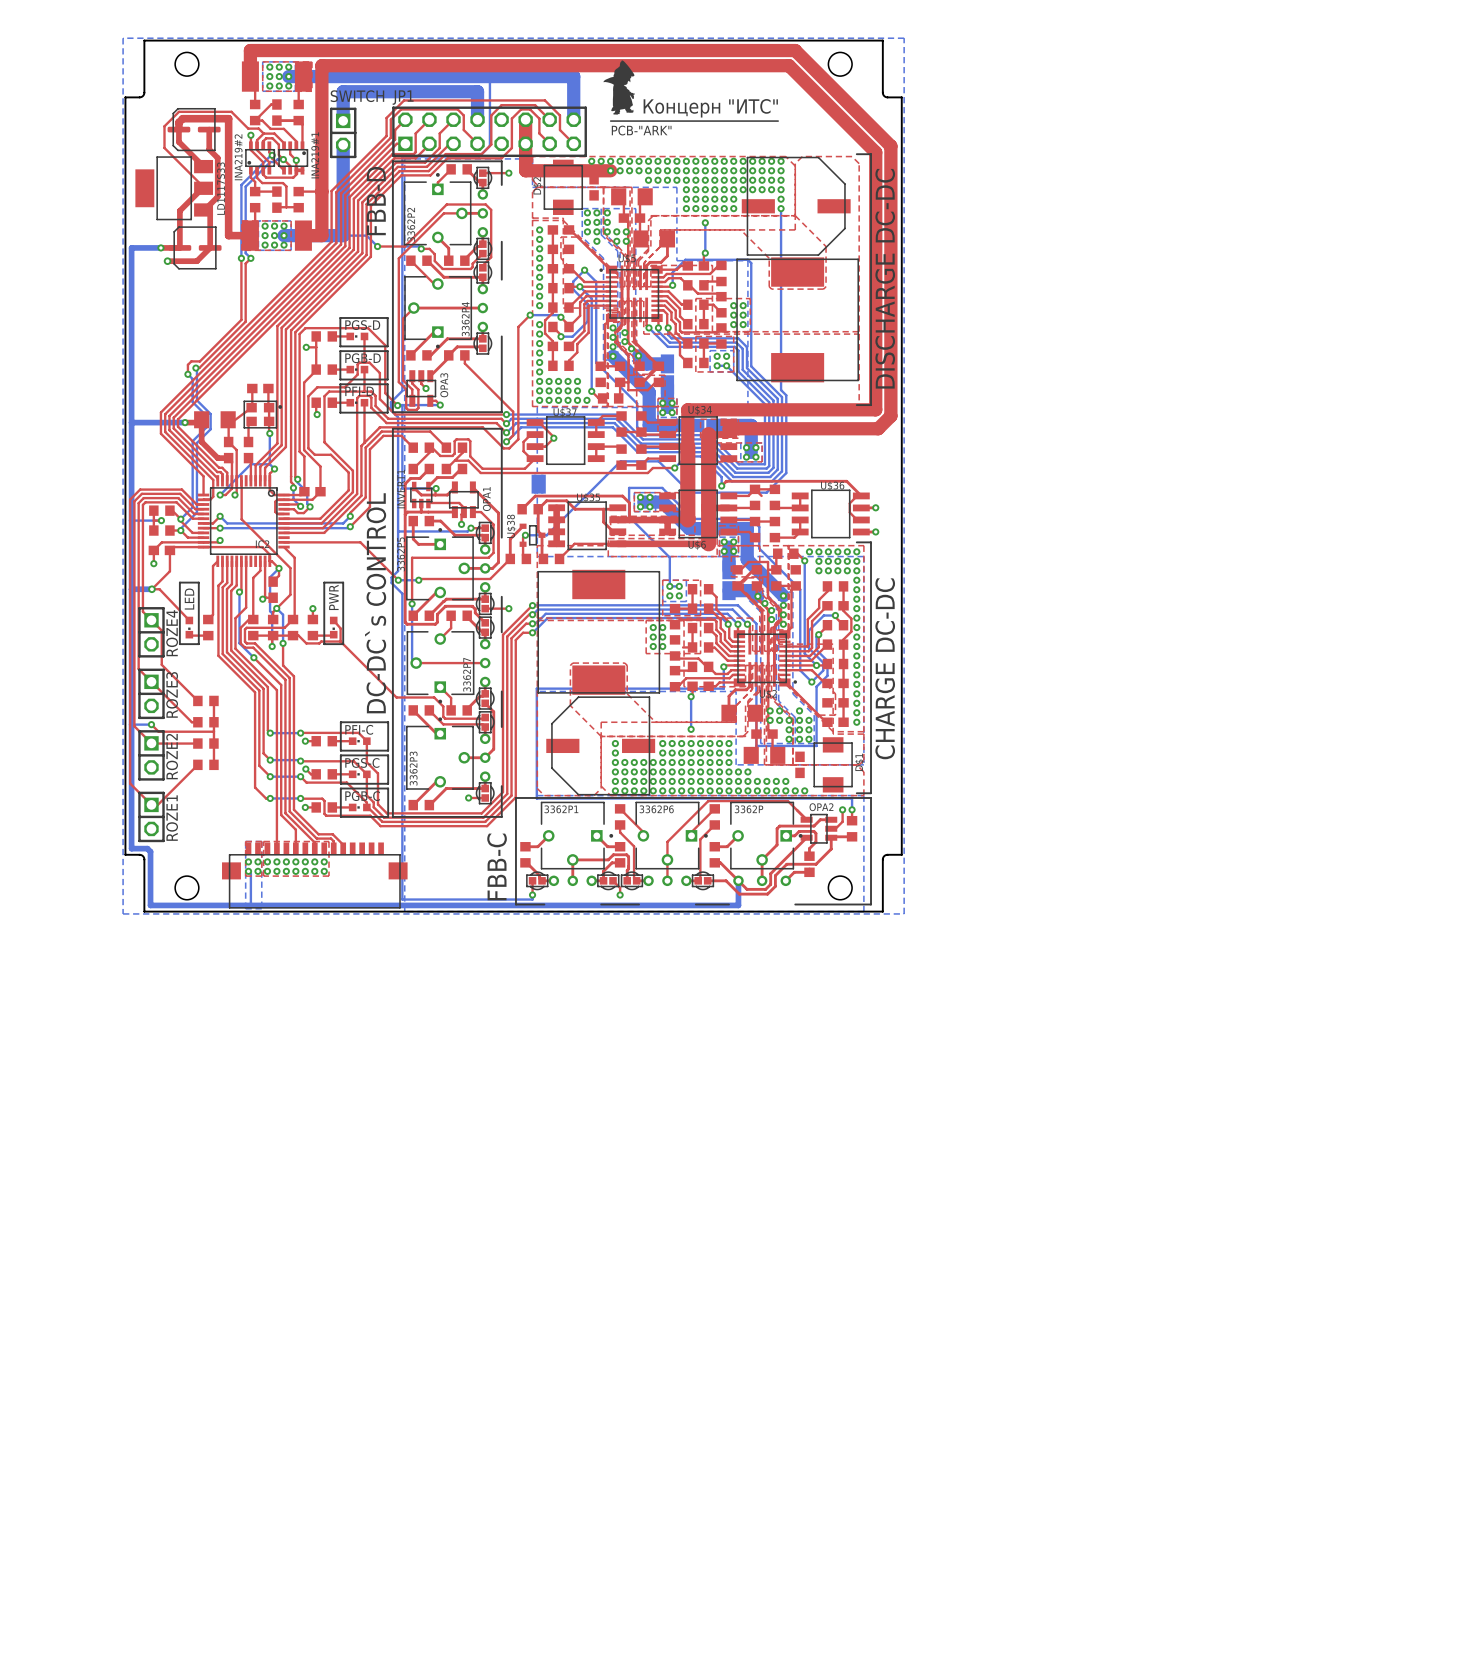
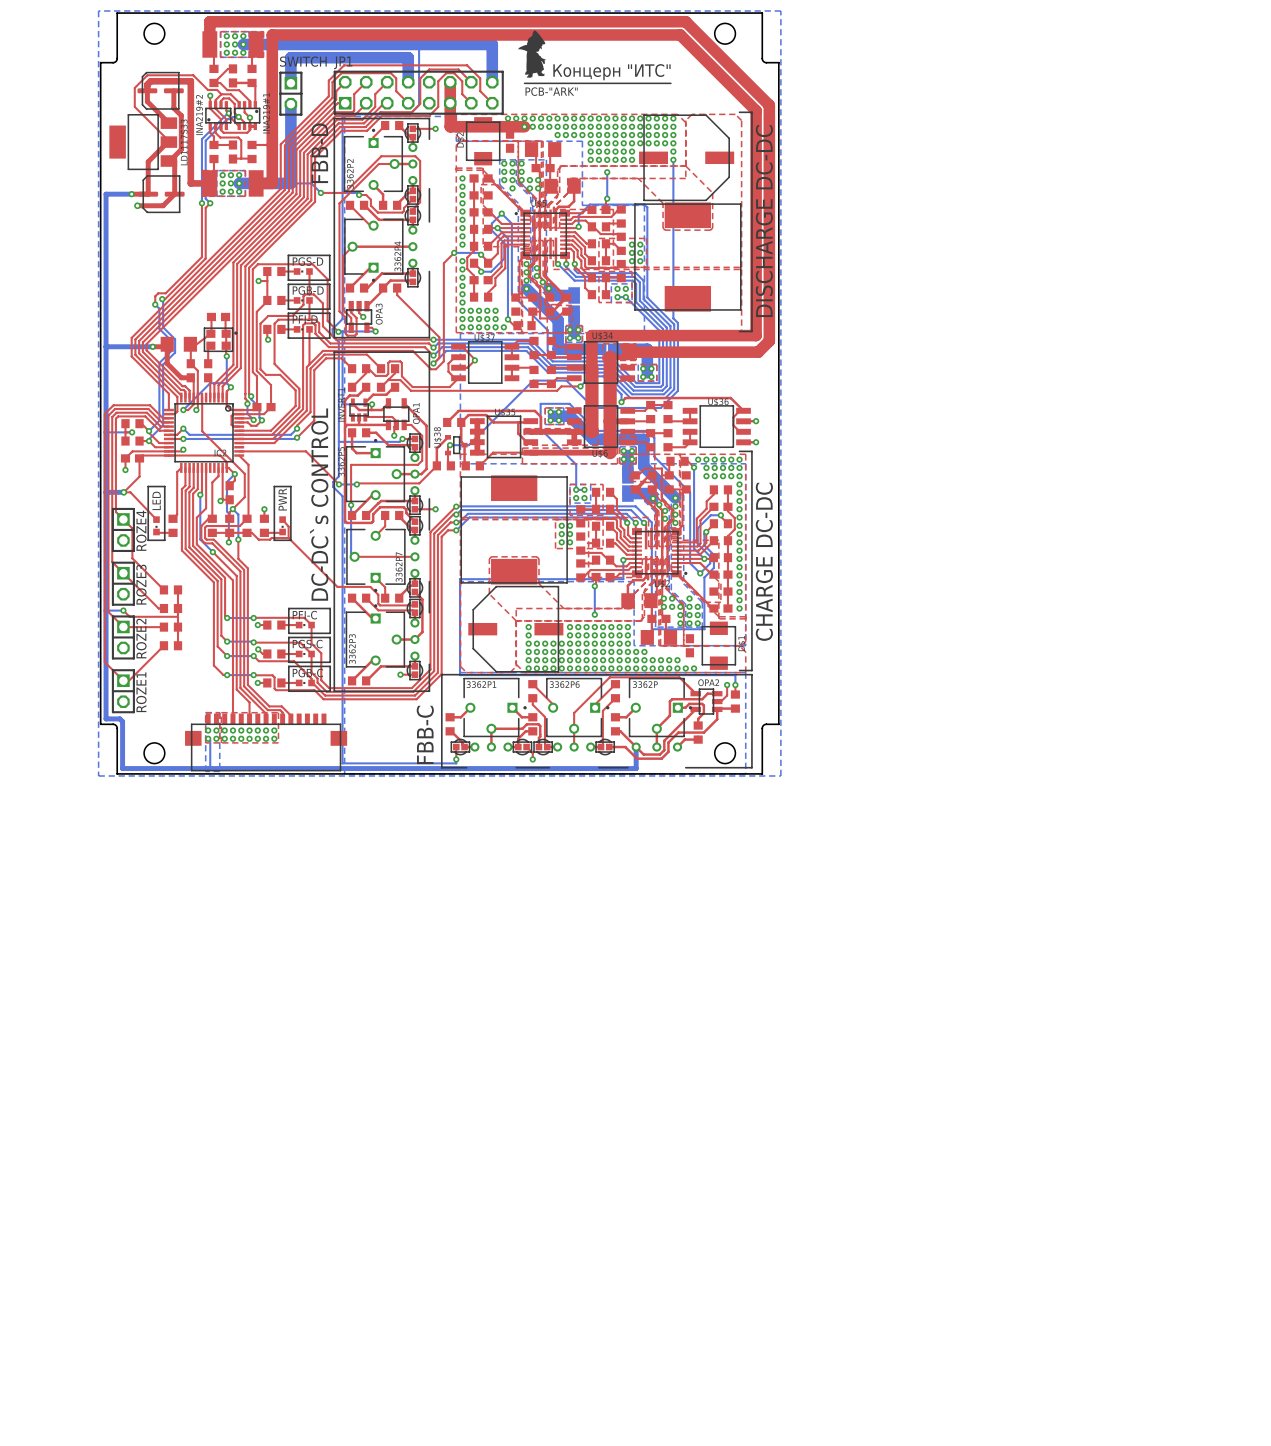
part: (538, 484) -> none

